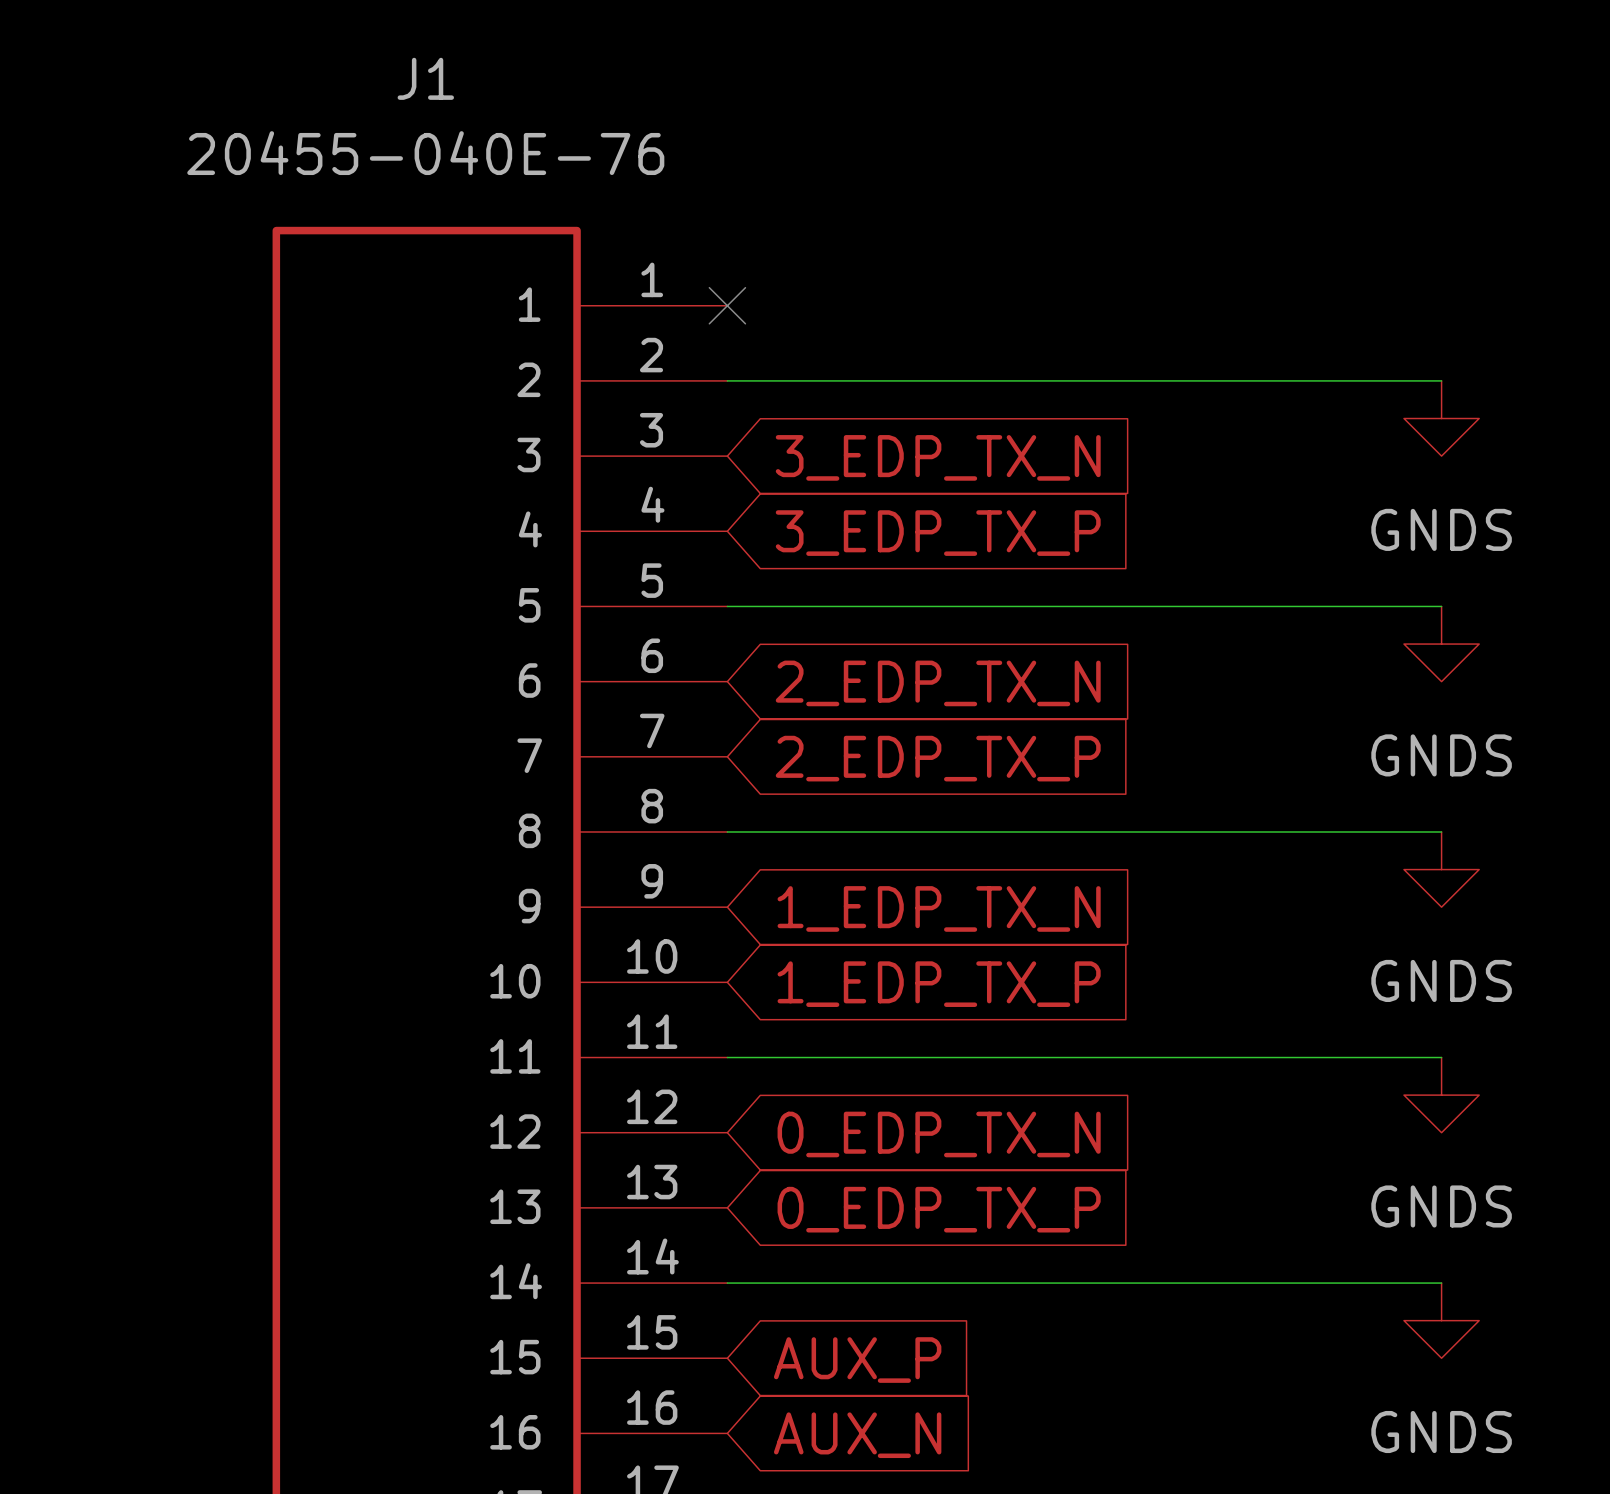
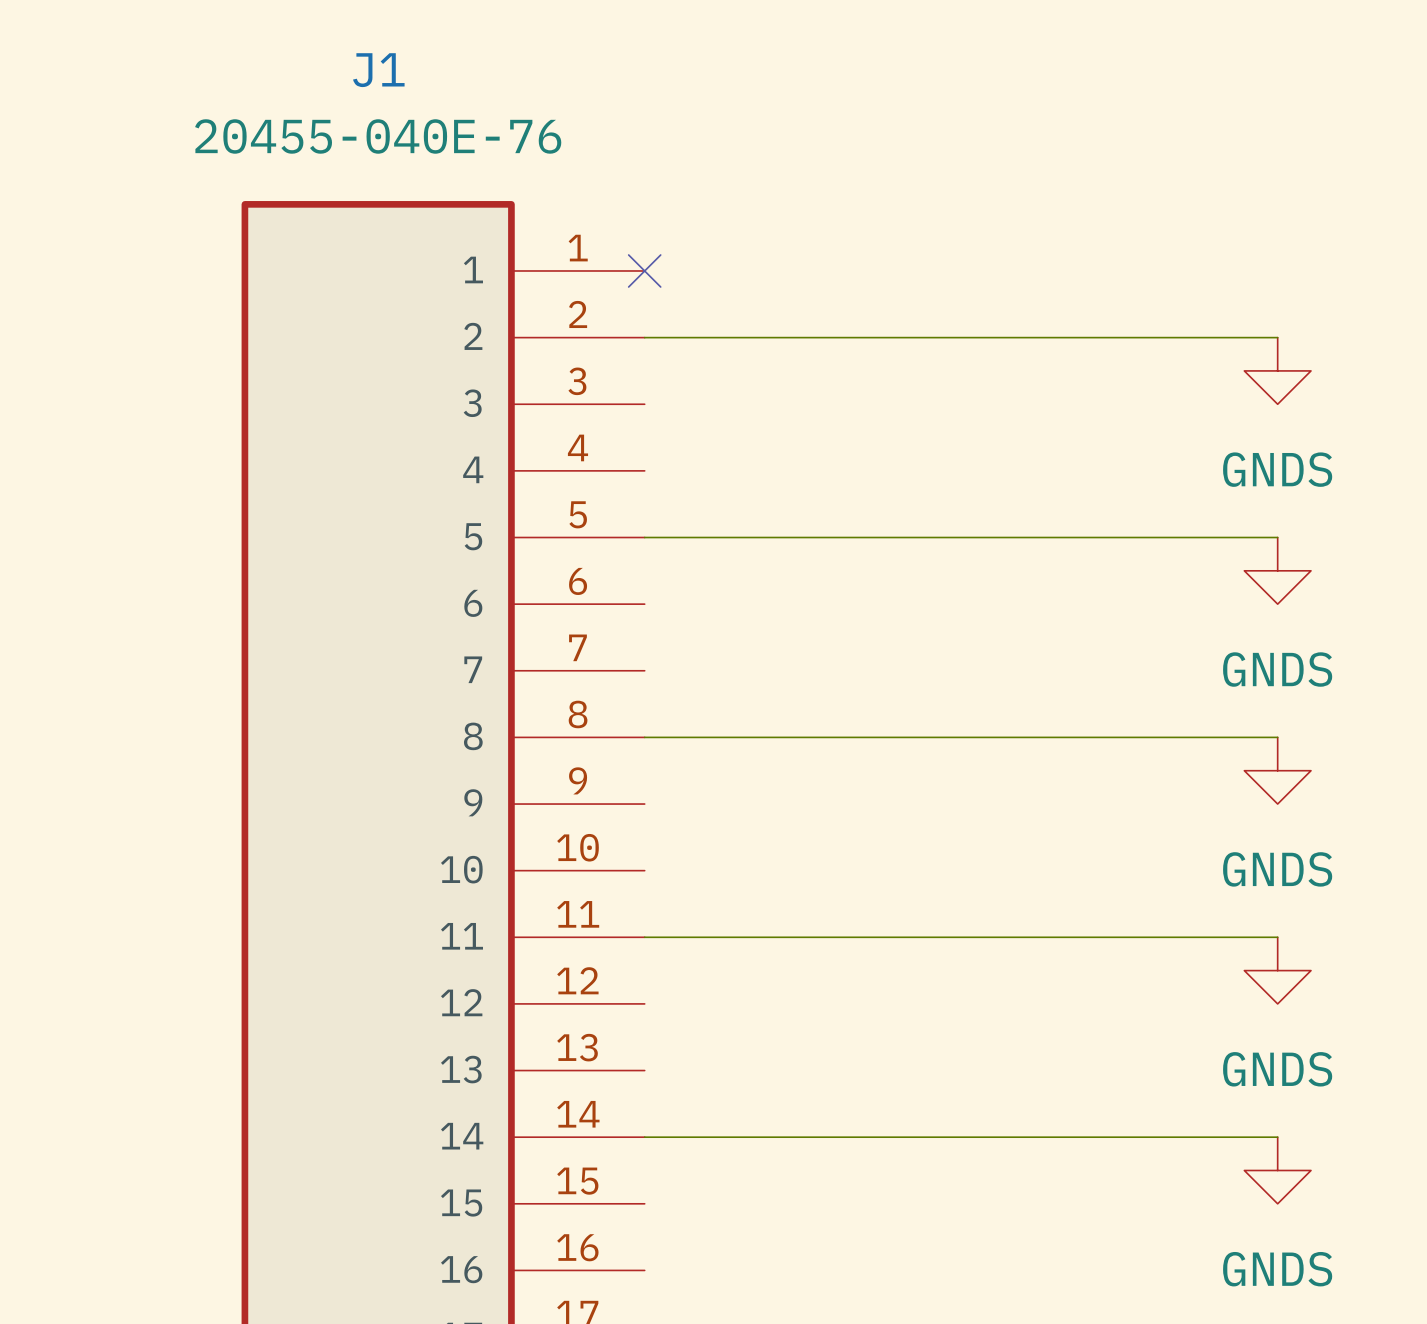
global label: 3_EDP_TX_N (938, 457) -> none
global label: 3_EDP_TX_P (938, 533) -> none
global label: 2_EDP_TX_N (938, 683) -> none
global label: 2_EDP_TX_P (938, 758) -> none
global label: 1_EDP_TX_N (939, 908) -> none
global label: 1_EDP_TX_P (939, 984) -> none
global label: 0_EDP_TX_N (939, 1134) -> none
global label: 0_EDP_TX_P (939, 1209) -> none
global label: AUX_P (857, 1360) -> none
global label: AUX_N (857, 1435) -> none

